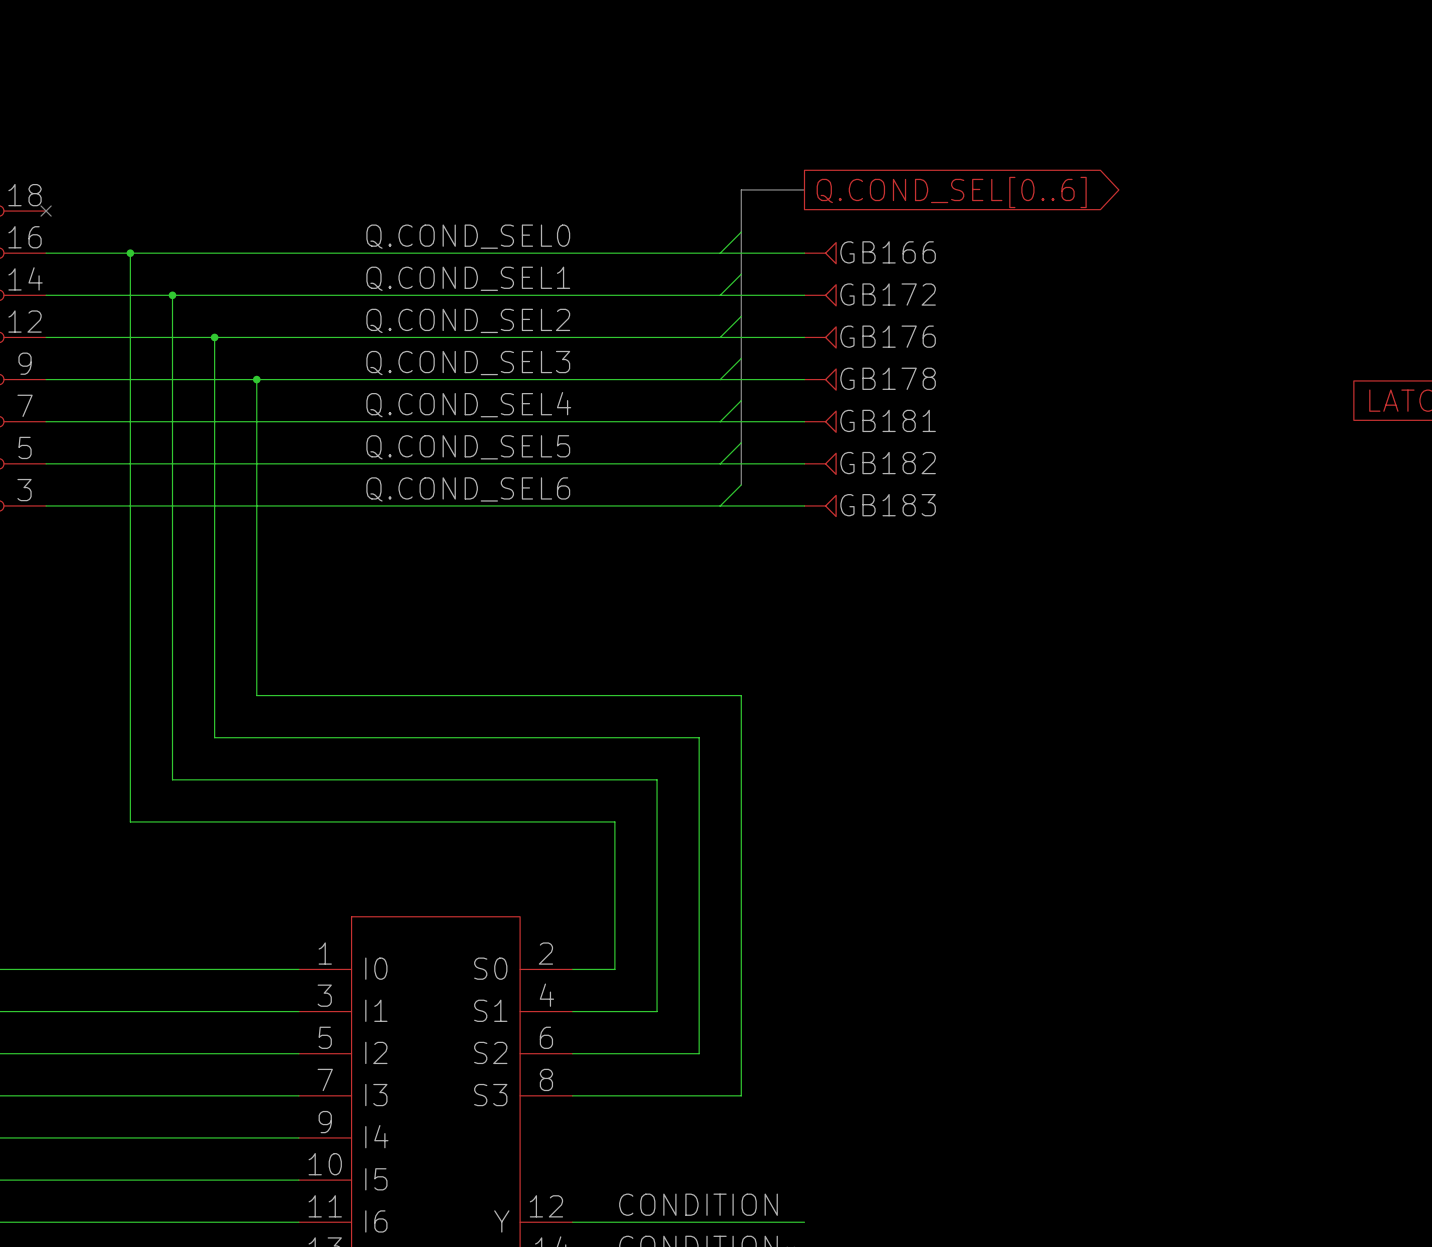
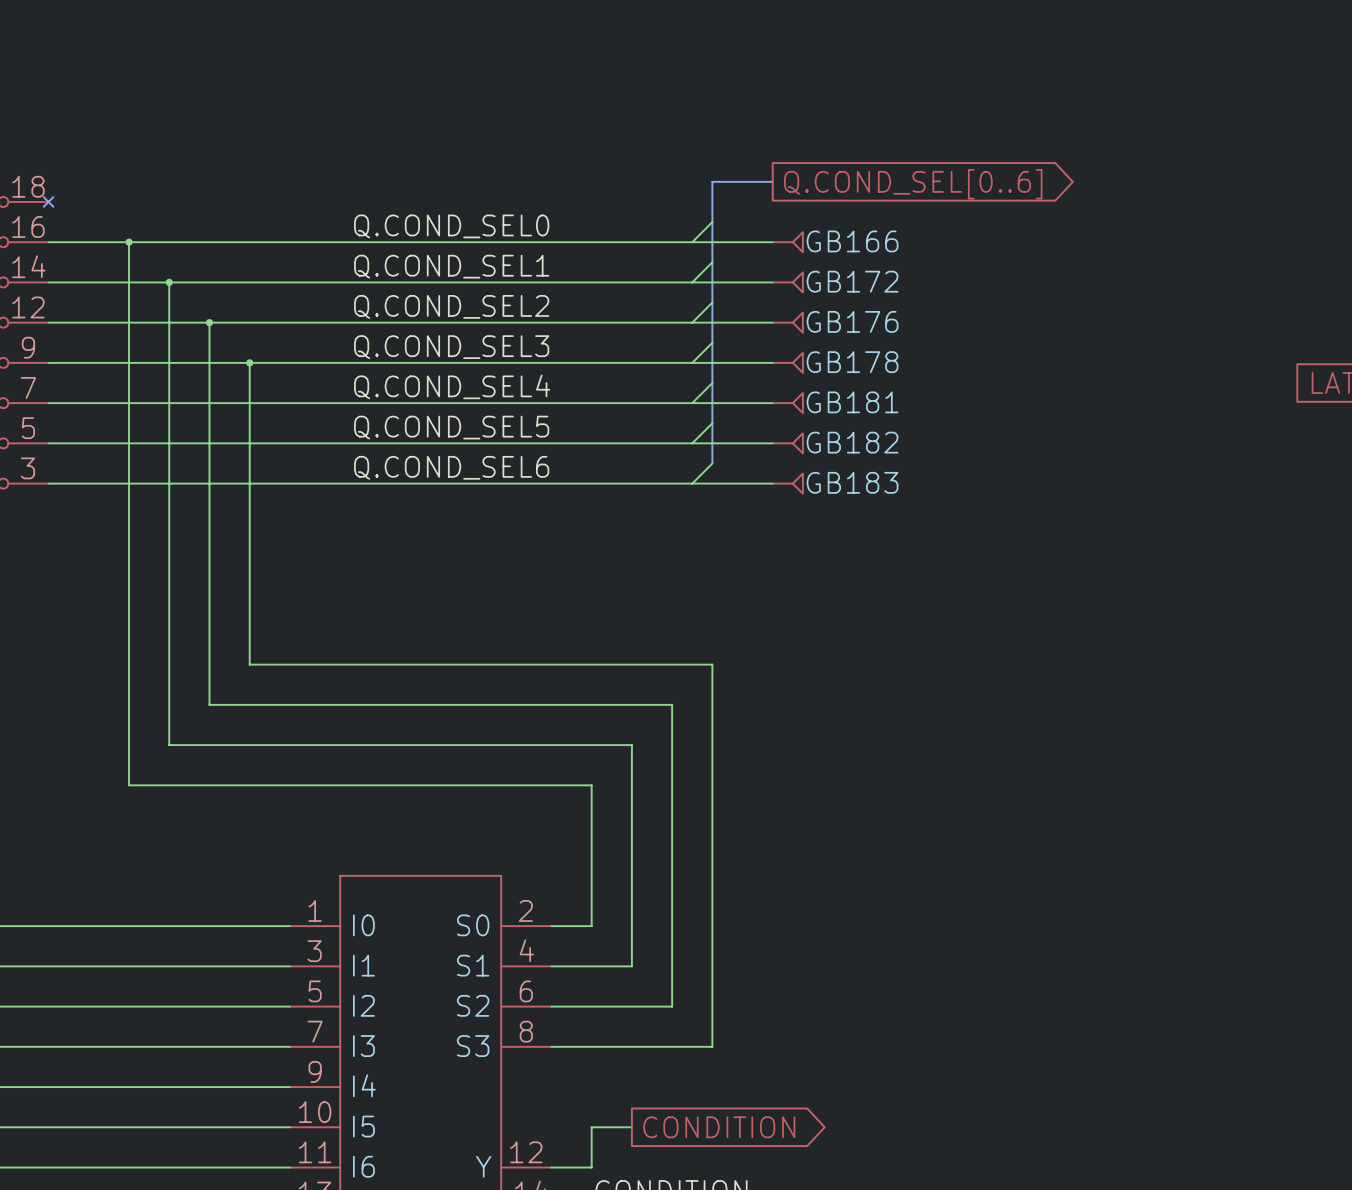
global label: none -> CONDITION (719, 1127)
label: CONDITION (698, 1204) -> none
wire: (614, 1222) (804, 1222) -> (591, 1167) (591, 1127) (631, 1127)

